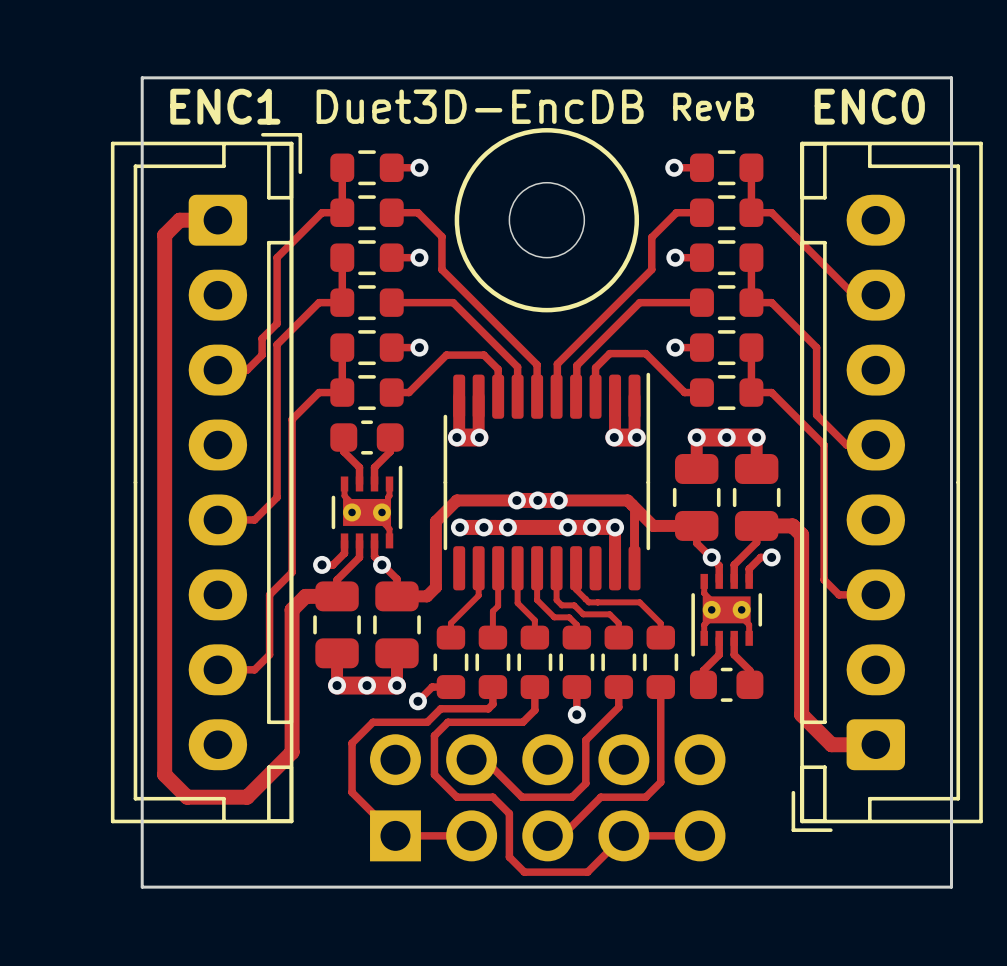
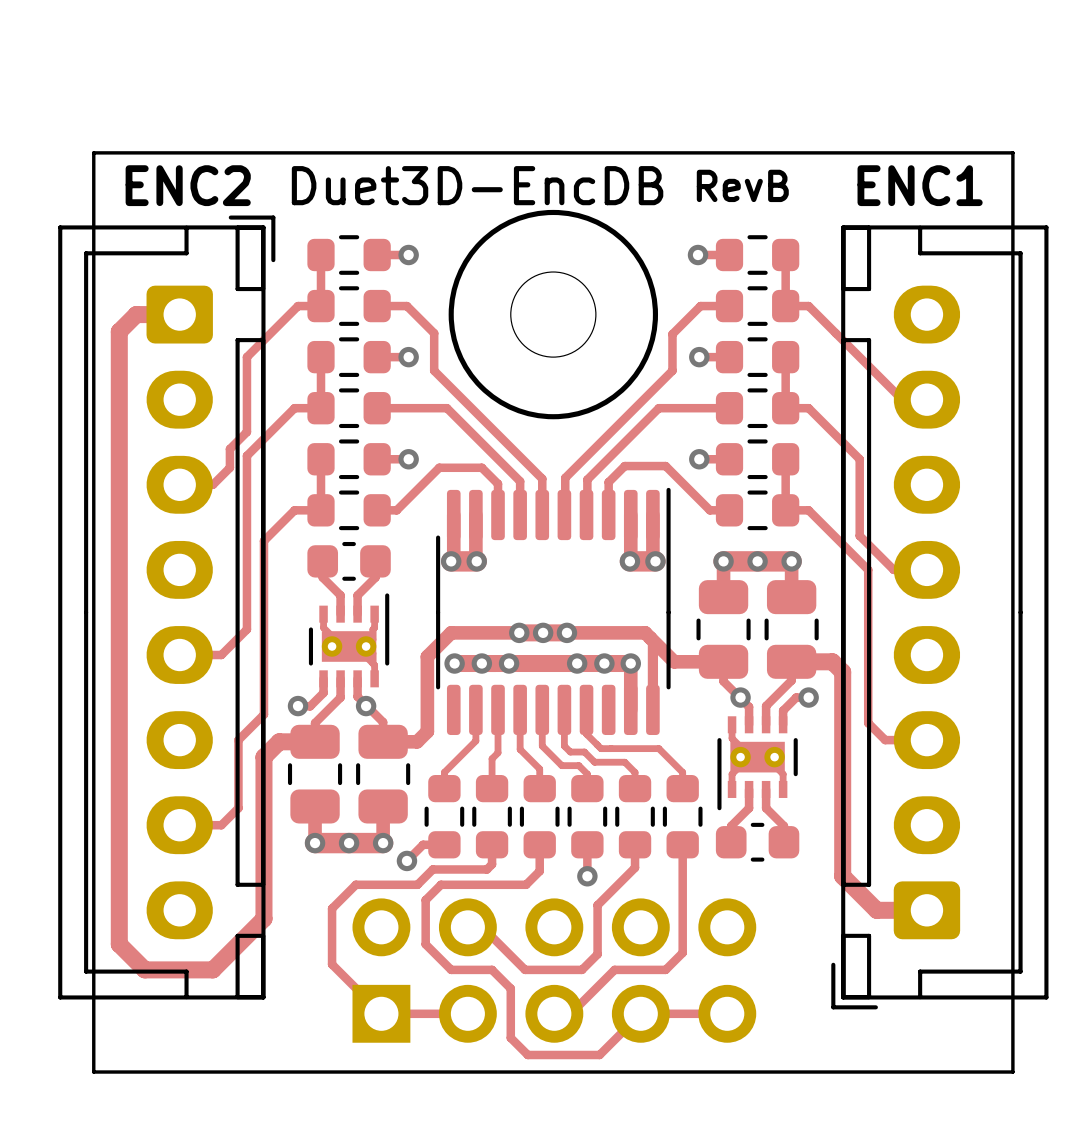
text: ENC1 (225, 106) -> ENC2 (188, 185)
text: ENC0 (869, 106) -> ENC1 (920, 185)

